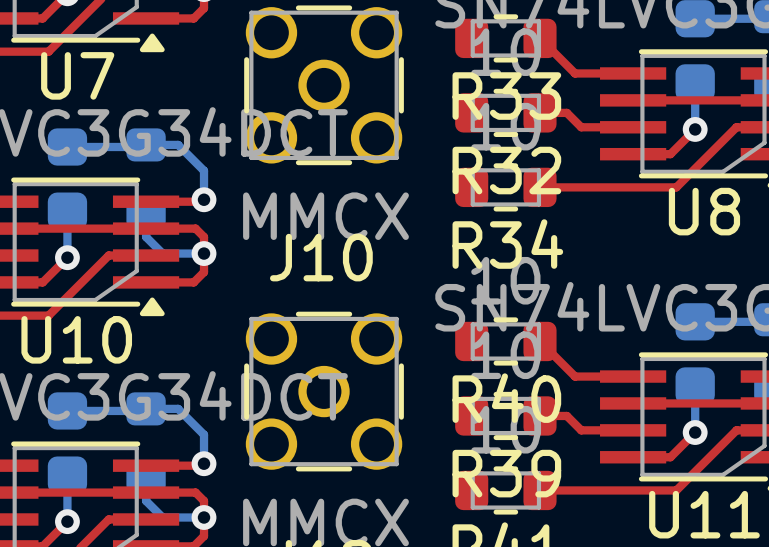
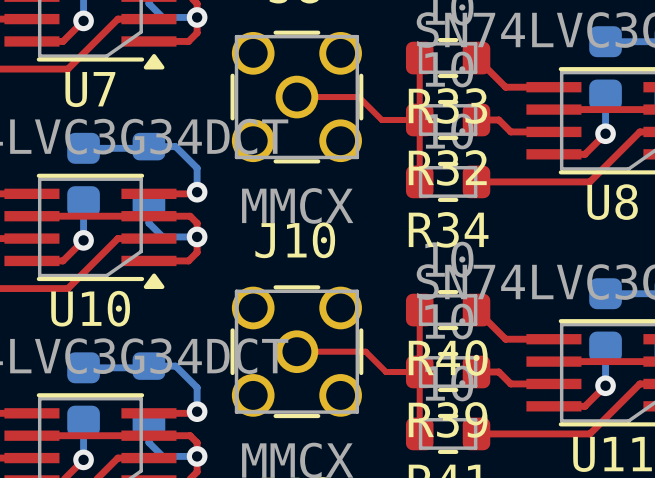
top track: none -> (419, 58) (419, 181)
top track: none -> (296, 97) (358, 97) (381, 119) (419, 119)
top track: none -> (419, 310) (419, 433)
top track: none -> (296, 351) (365, 351) (386, 371) (419, 371)

